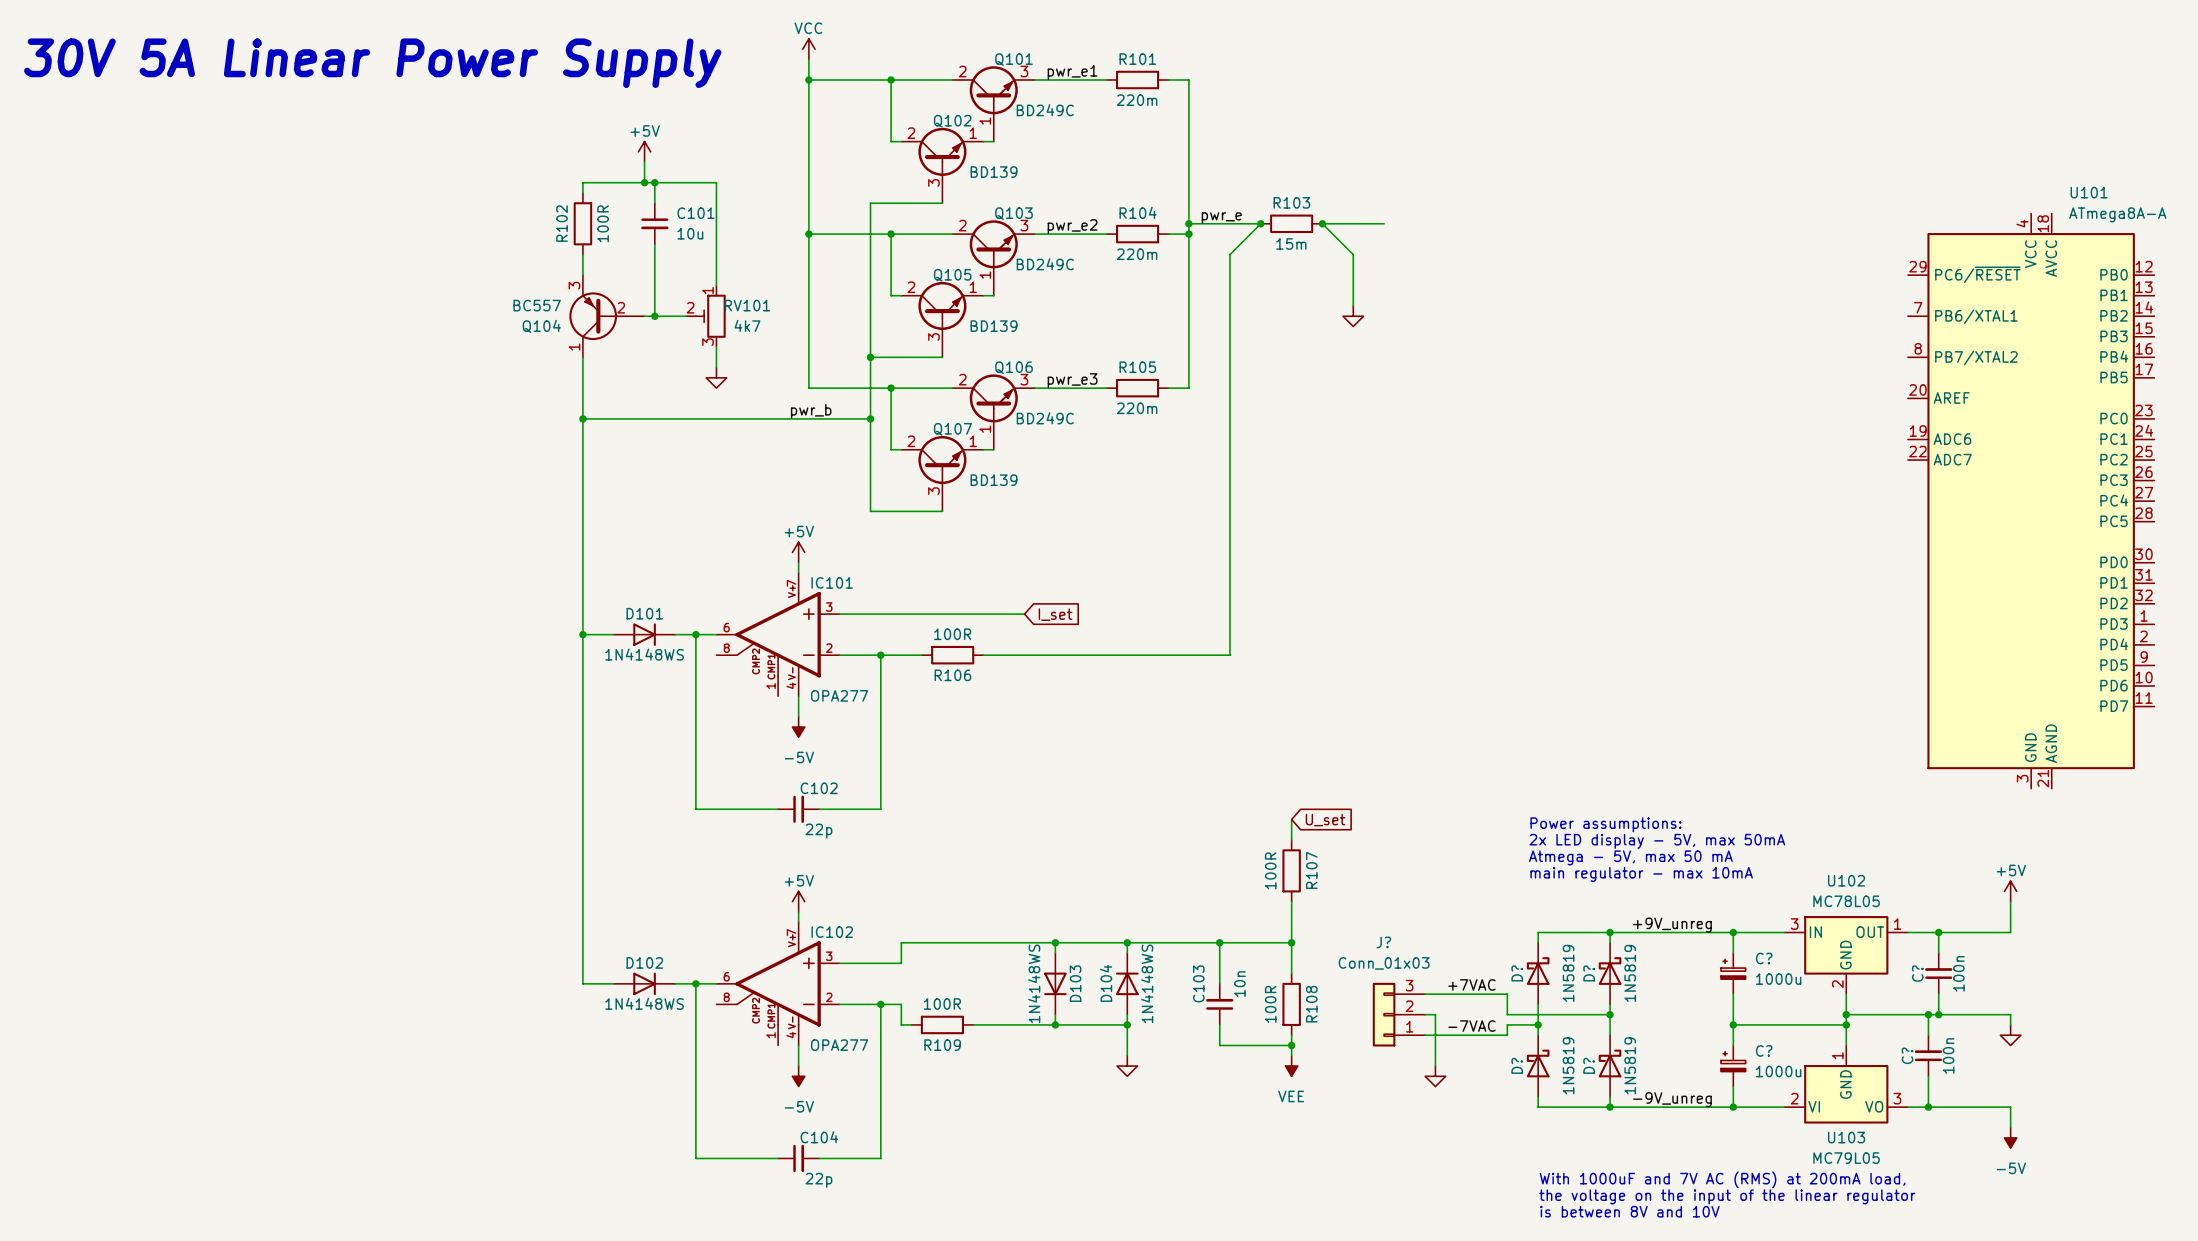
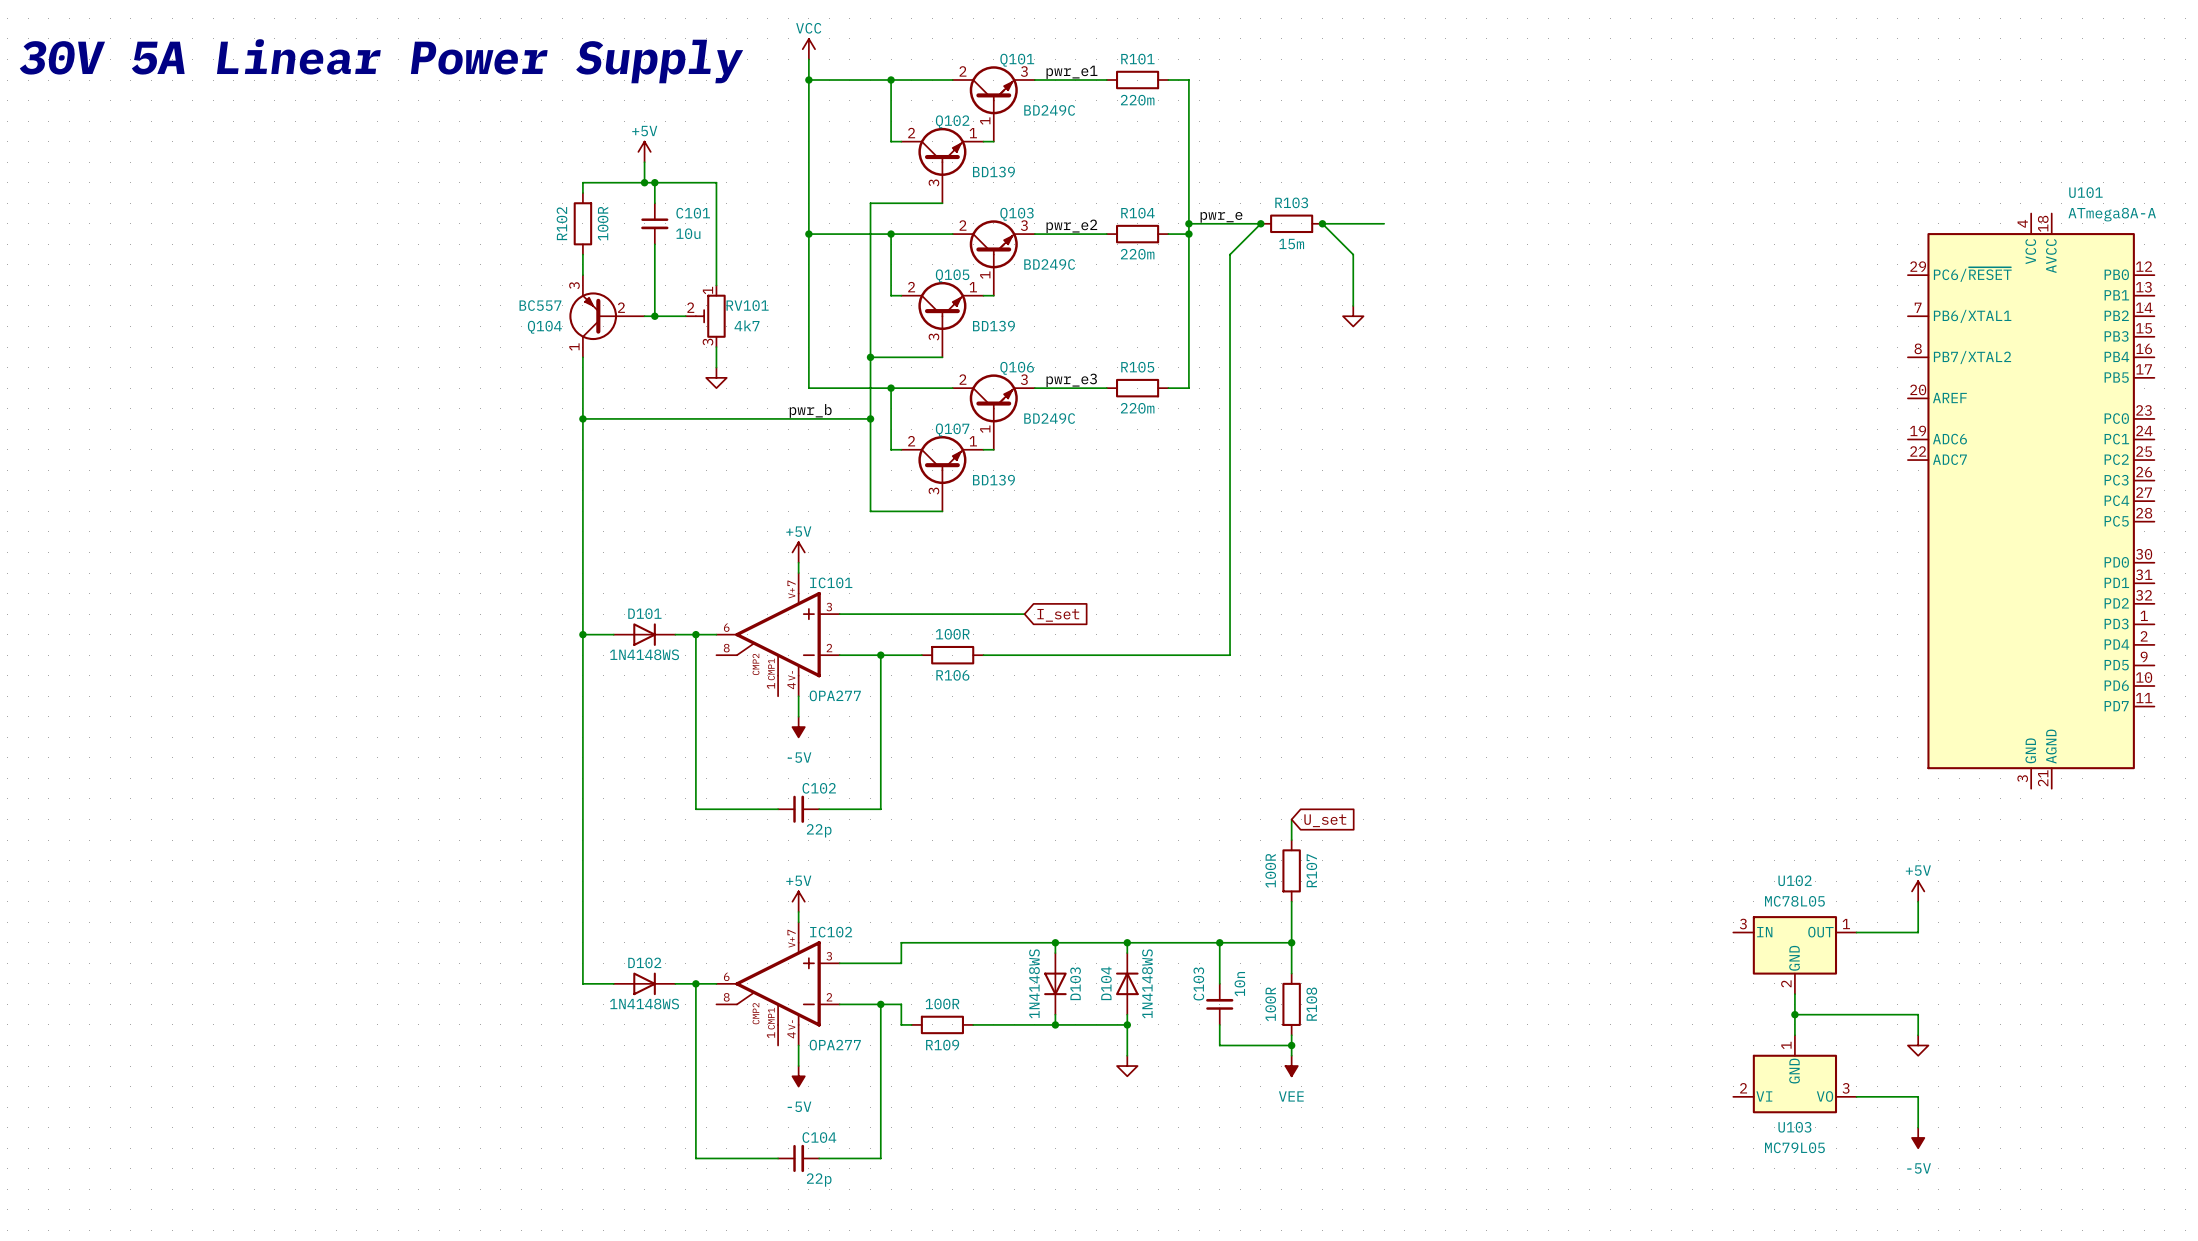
text: Power assumptions: (1605, 824) -> none
text: 2x LED display - 5V, max 50mA (1657, 841) -> none
text: Atmega - 5V, max 50 mA (1630, 857) -> none
text: main regulator - max 10mA (1641, 874) -> none
power symbol position: +5V (2010, 891) -> +5V (1918, 891)
wire: (2010, 901) (2010, 932) (1918, 932) -> (1918, 901) (1918, 932)
label: +9V_unreg (1672, 925) -> none
wire: (1610, 932) (1610, 942) -> none
junction: (1610, 932) -> none
wire: (1733, 932) (1733, 953) -> none
junction: (1733, 932) -> none
wire: (1784, 932) (1538, 932) (1538, 942) -> none
wire: (1938, 932) (1938, 953) -> none
junction: (1938, 932) -> none
U102 position: (1846, 955) -> (1794, 955)
D?: 1N5819 (1538, 973) -> none
D?: 1N5819 (1610, 973) -> none
C?: 1000u (1733, 973) -> none
C?: 100n (1938, 973) -> none
label: +7VAC (1471, 984) -> none
wire: (1425, 994) (1507, 994) (1507, 1014) (1610, 1014) -> none
wire: (1733, 994) (1733, 1045) -> none
wire: none -> (1794, 994) (1794, 1035)
wire: (1846, 994) (1846, 1045) -> none
wire: (1938, 994) (1938, 1014) -> none
wire: (1538, 1004) (1538, 1035) -> none
wire: (1610, 1004) (1610, 1035) -> none
J?: Conn_01x03 (1398, 1014) -> none
wire: (1425, 1014) (1435, 1014) (1435, 1066) -> none
junction: (1610, 1014) -> none
wire: none -> (1794, 1014) (1846, 1014)
junction: none -> (1794, 1014)
junction: (1846, 1014) -> none
wire: (1918, 1014) (2010, 1014) (2010, 1024) -> (1918, 1014) (1918, 1035)
wire: (1928, 1014) (1928, 1035) -> none
junction: (1928, 1014) -> none
junction: (1938, 1014) -> none
wire: (1538, 1024) (1507, 1024) (1507, 1035) (1425, 1035) -> none
junction: (1538, 1024) -> none
wire: (1733, 1024) (1846, 1024) -> none
junction: (1733, 1024) -> none
junction: (1846, 1024) -> none
label: -7VAC (1471, 1026) -> none
power symbol position: (2010, 1035) -> (1918, 1045)
C?: 100n (1928, 1055) -> none
D?: 1N5819 (1538, 1066) -> none
D?: 1N5819 (1610, 1066) -> none
C?: 1000u (1733, 1066) -> none
power symbol: (1435, 1076) -> none
wire: (1928, 1076) (1928, 1107) -> none
U103 position: (1846, 1084) -> (1794, 1074)
wire: (1733, 1086) (1733, 1107) -> none
wire: (1538, 1096) (1538, 1107) (1784, 1107) -> none
wire: (1610, 1096) (1610, 1107) -> none
wire: none -> (1856, 1096) (1918, 1096) (1918, 1127)
label: -9V_unreg (1672, 1099) -> none
junction: (1610, 1107) -> none
junction: (1733, 1107) -> none
wire: (1907, 1107) (2010, 1107) (2010, 1127) -> none
junction: (1928, 1107) -> none
power symbol position: -5V (2010, 1137) -> -5V (1918, 1137)
text: With 1000uF and 7V AC (RMS) at 200mA load, (1722, 1179) -> none
text: the voltage on the input of the linear regulator (1727, 1196) -> none
text: is between 8V and 10V (1629, 1211) -> none

